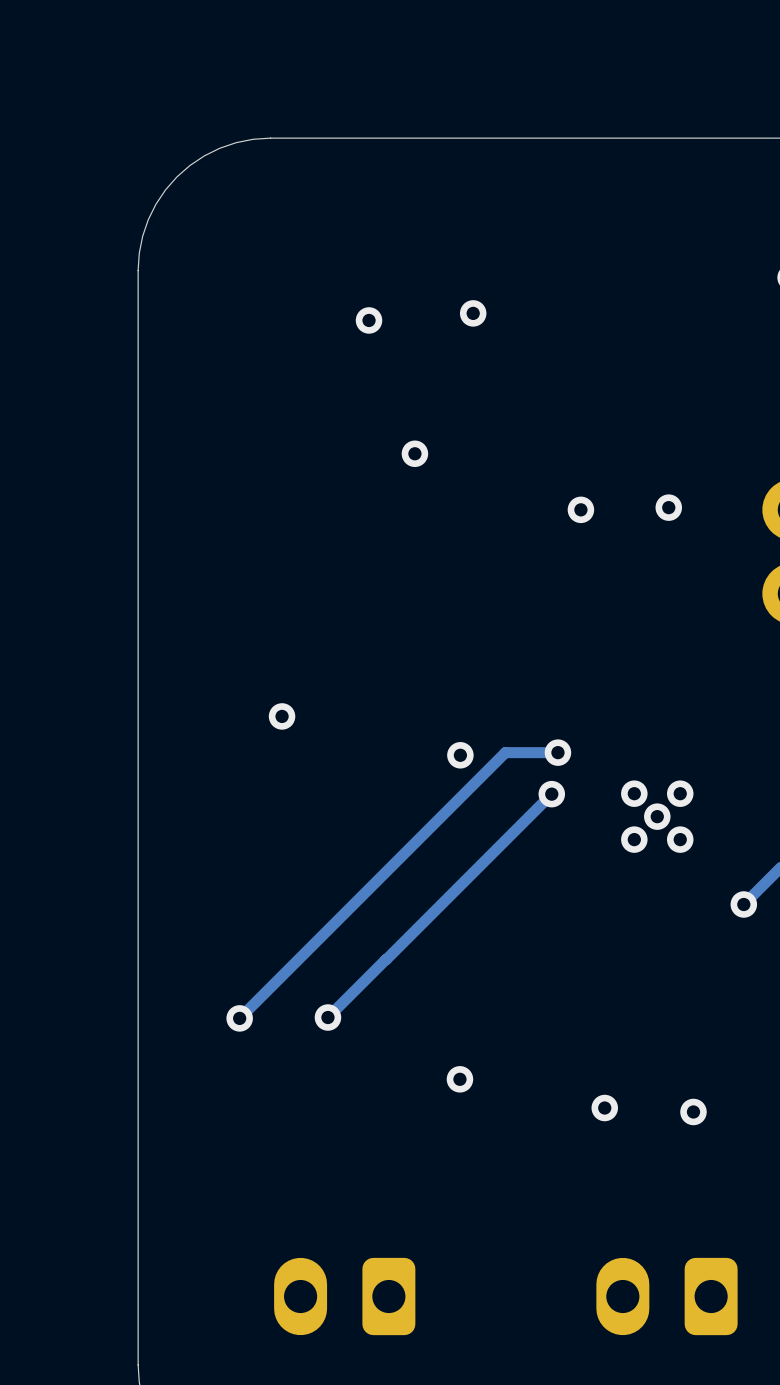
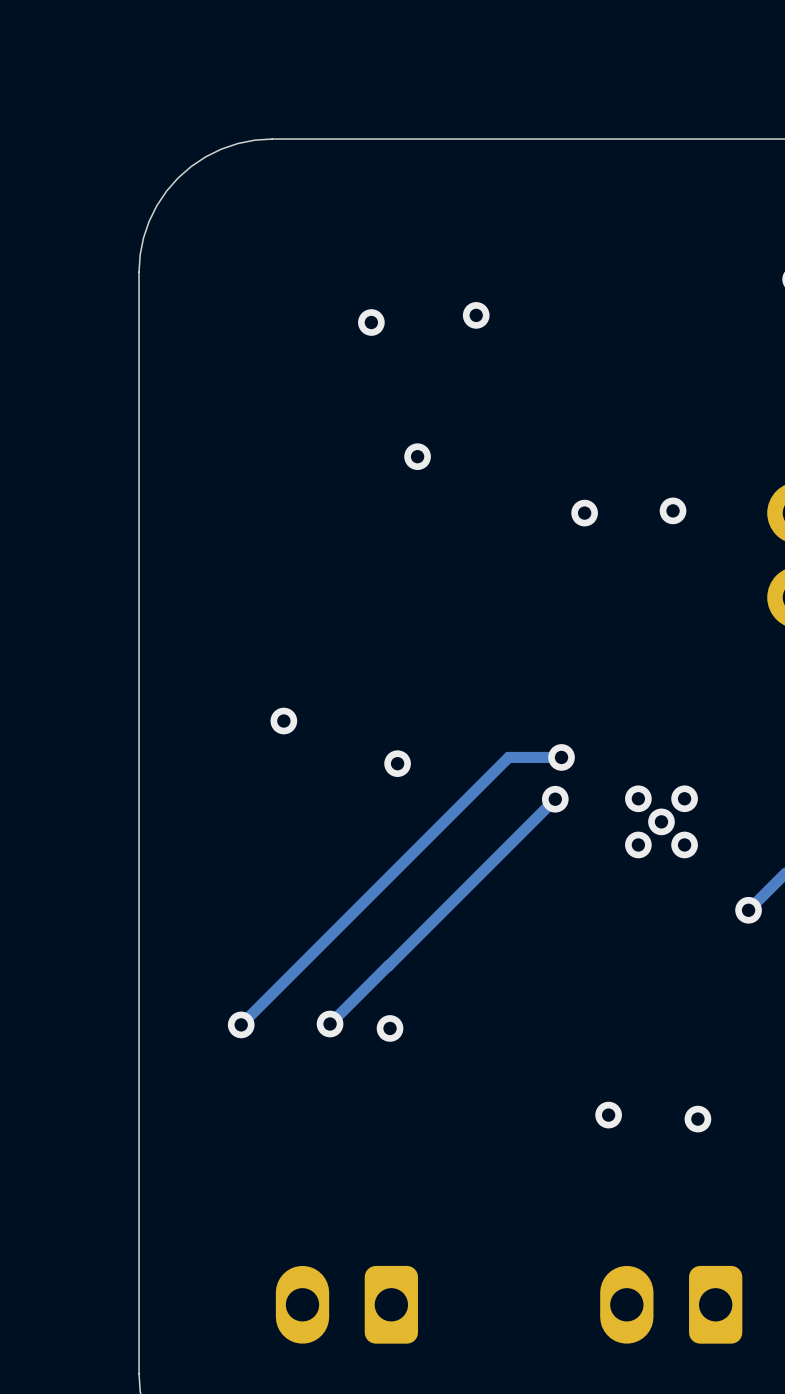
via position: (460, 755) -> (397, 763)
via position: (459, 1079) -> (390, 1028)

